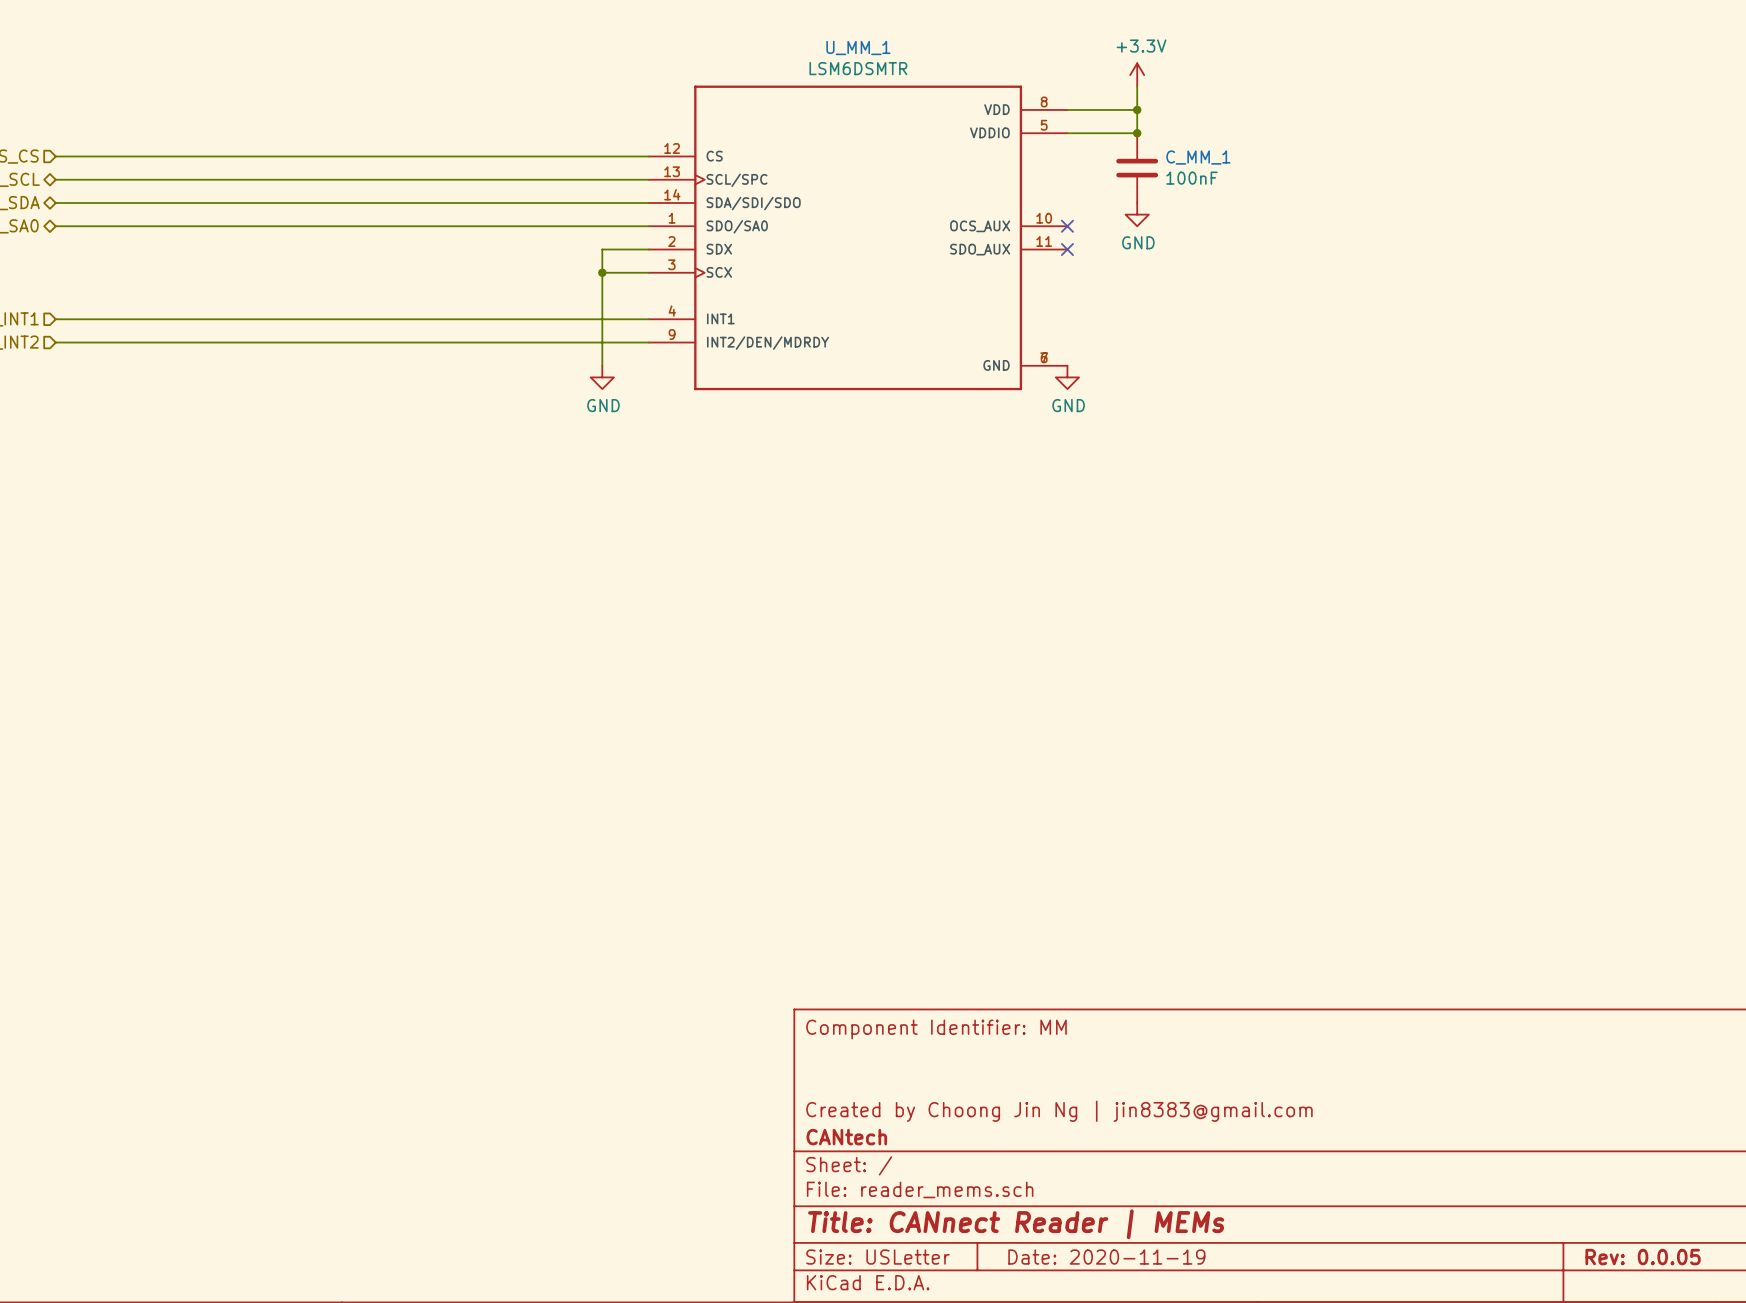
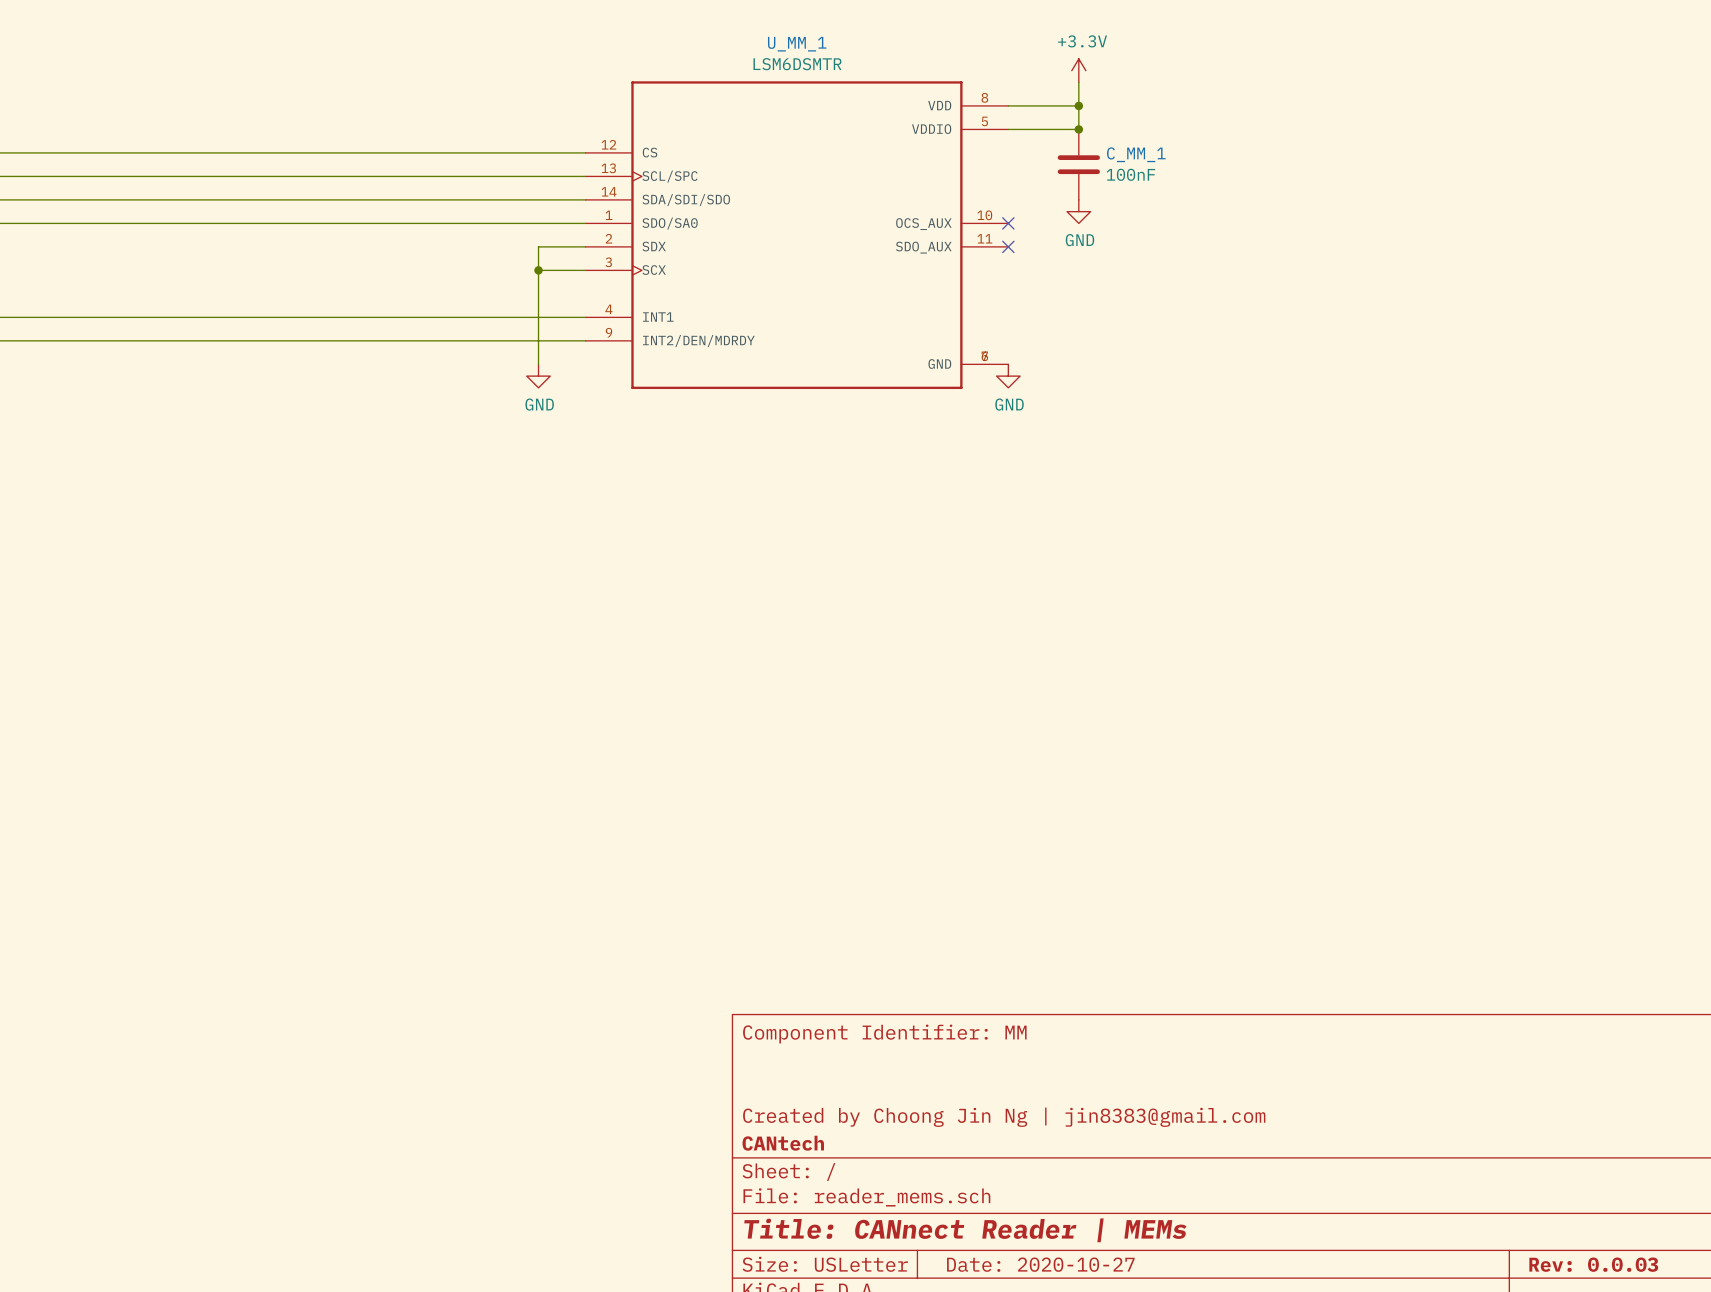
title block: Date: 2020-11-19 (1106, 1257) -> Date: 2020-10-27 (1040, 1264)
title block: Rev: 0.0.05 (1643, 1257) -> Rev: 0.0.03 (1593, 1264)

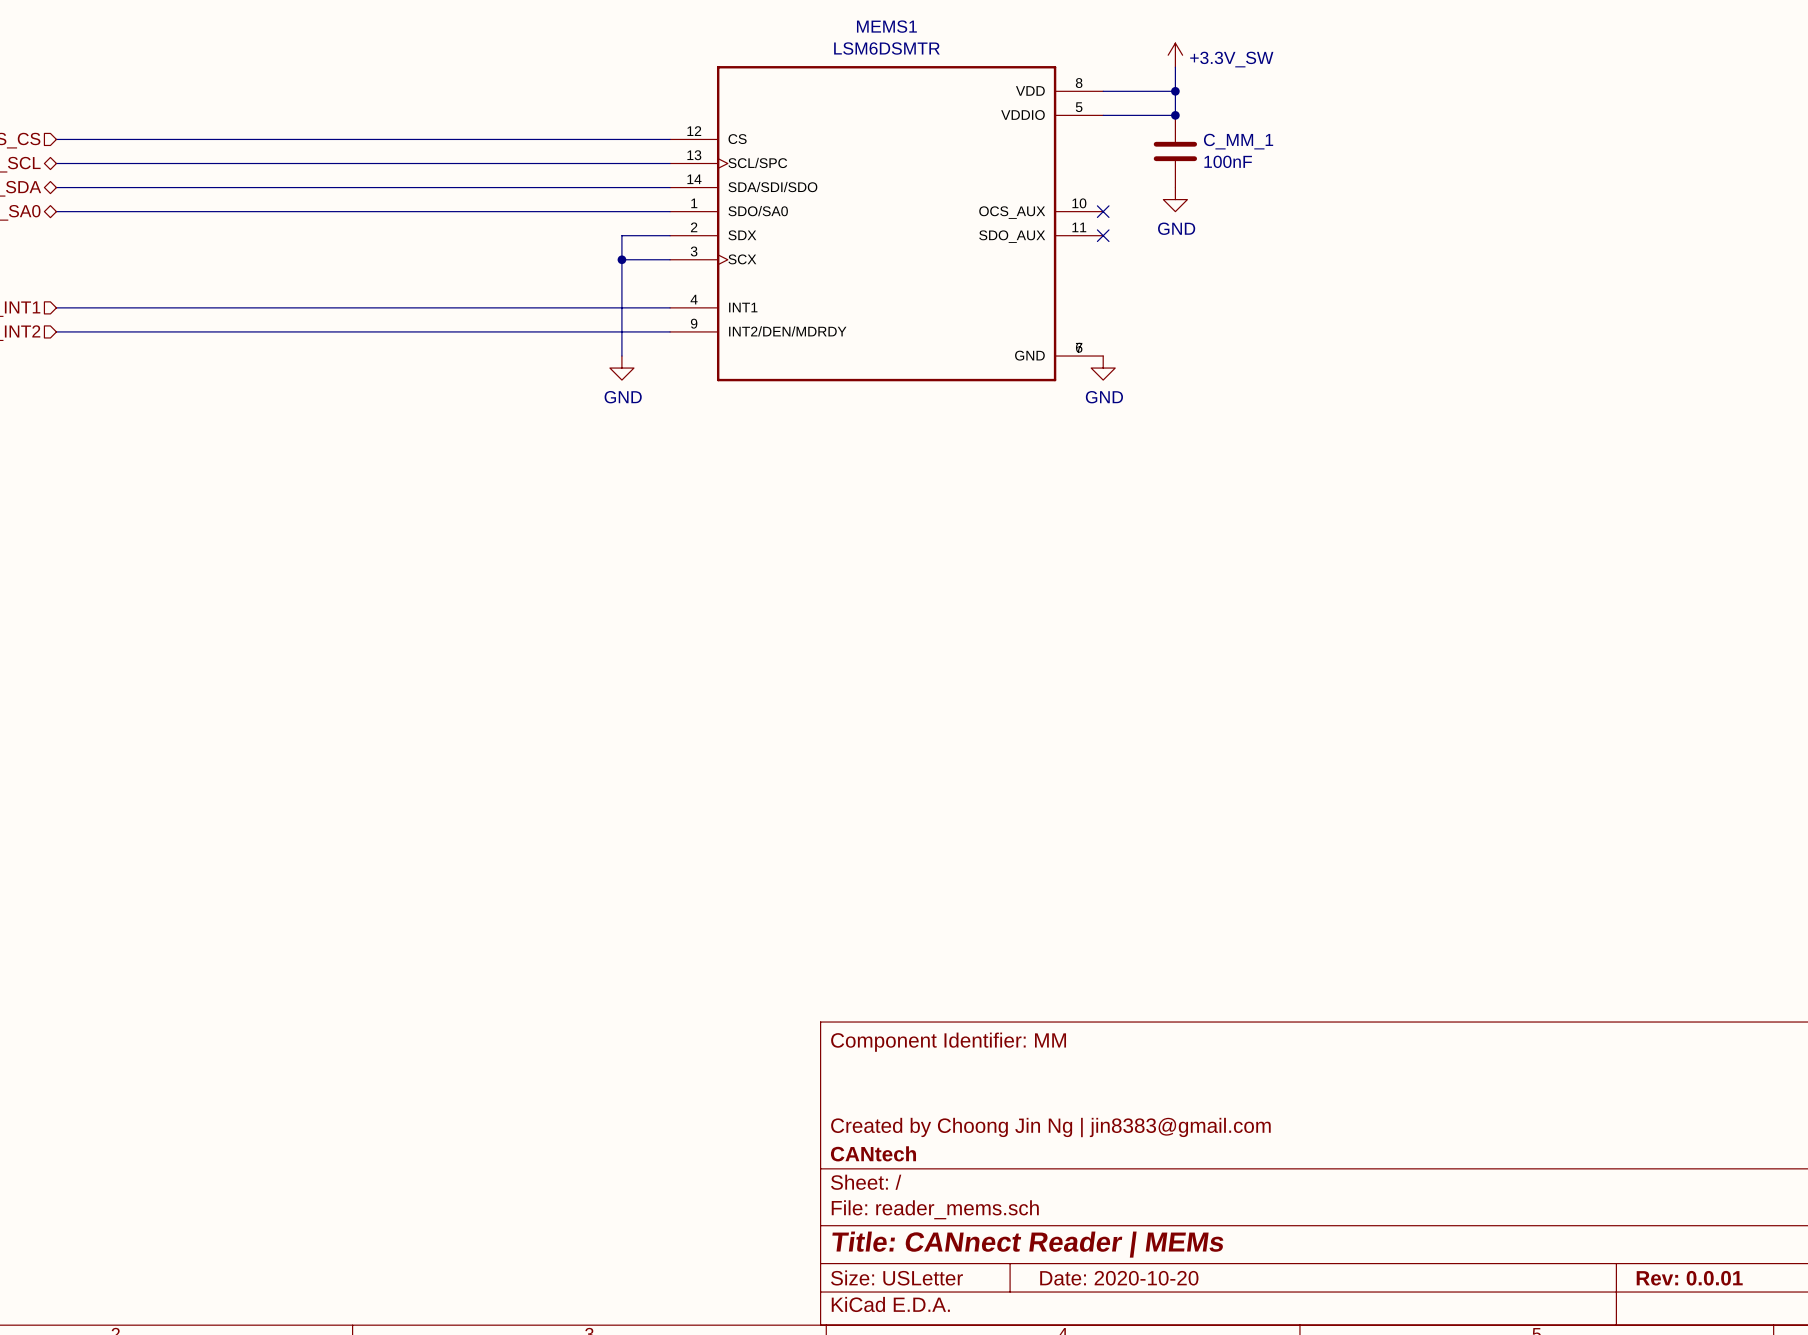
U_MM_1 name: U_MM_1 (797, 44) -> MEMS1 (886, 26)
power symbol: +3.3V (1078, 70) -> +3.3V_SW (1175, 55)
title block: Date: 2020-10-27 (1040, 1264) -> Date: 2020-10-20 (1119, 1278)
title block: Rev: 0.0.03 (1593, 1264) -> Rev: 0.0.01 (1689, 1278)

